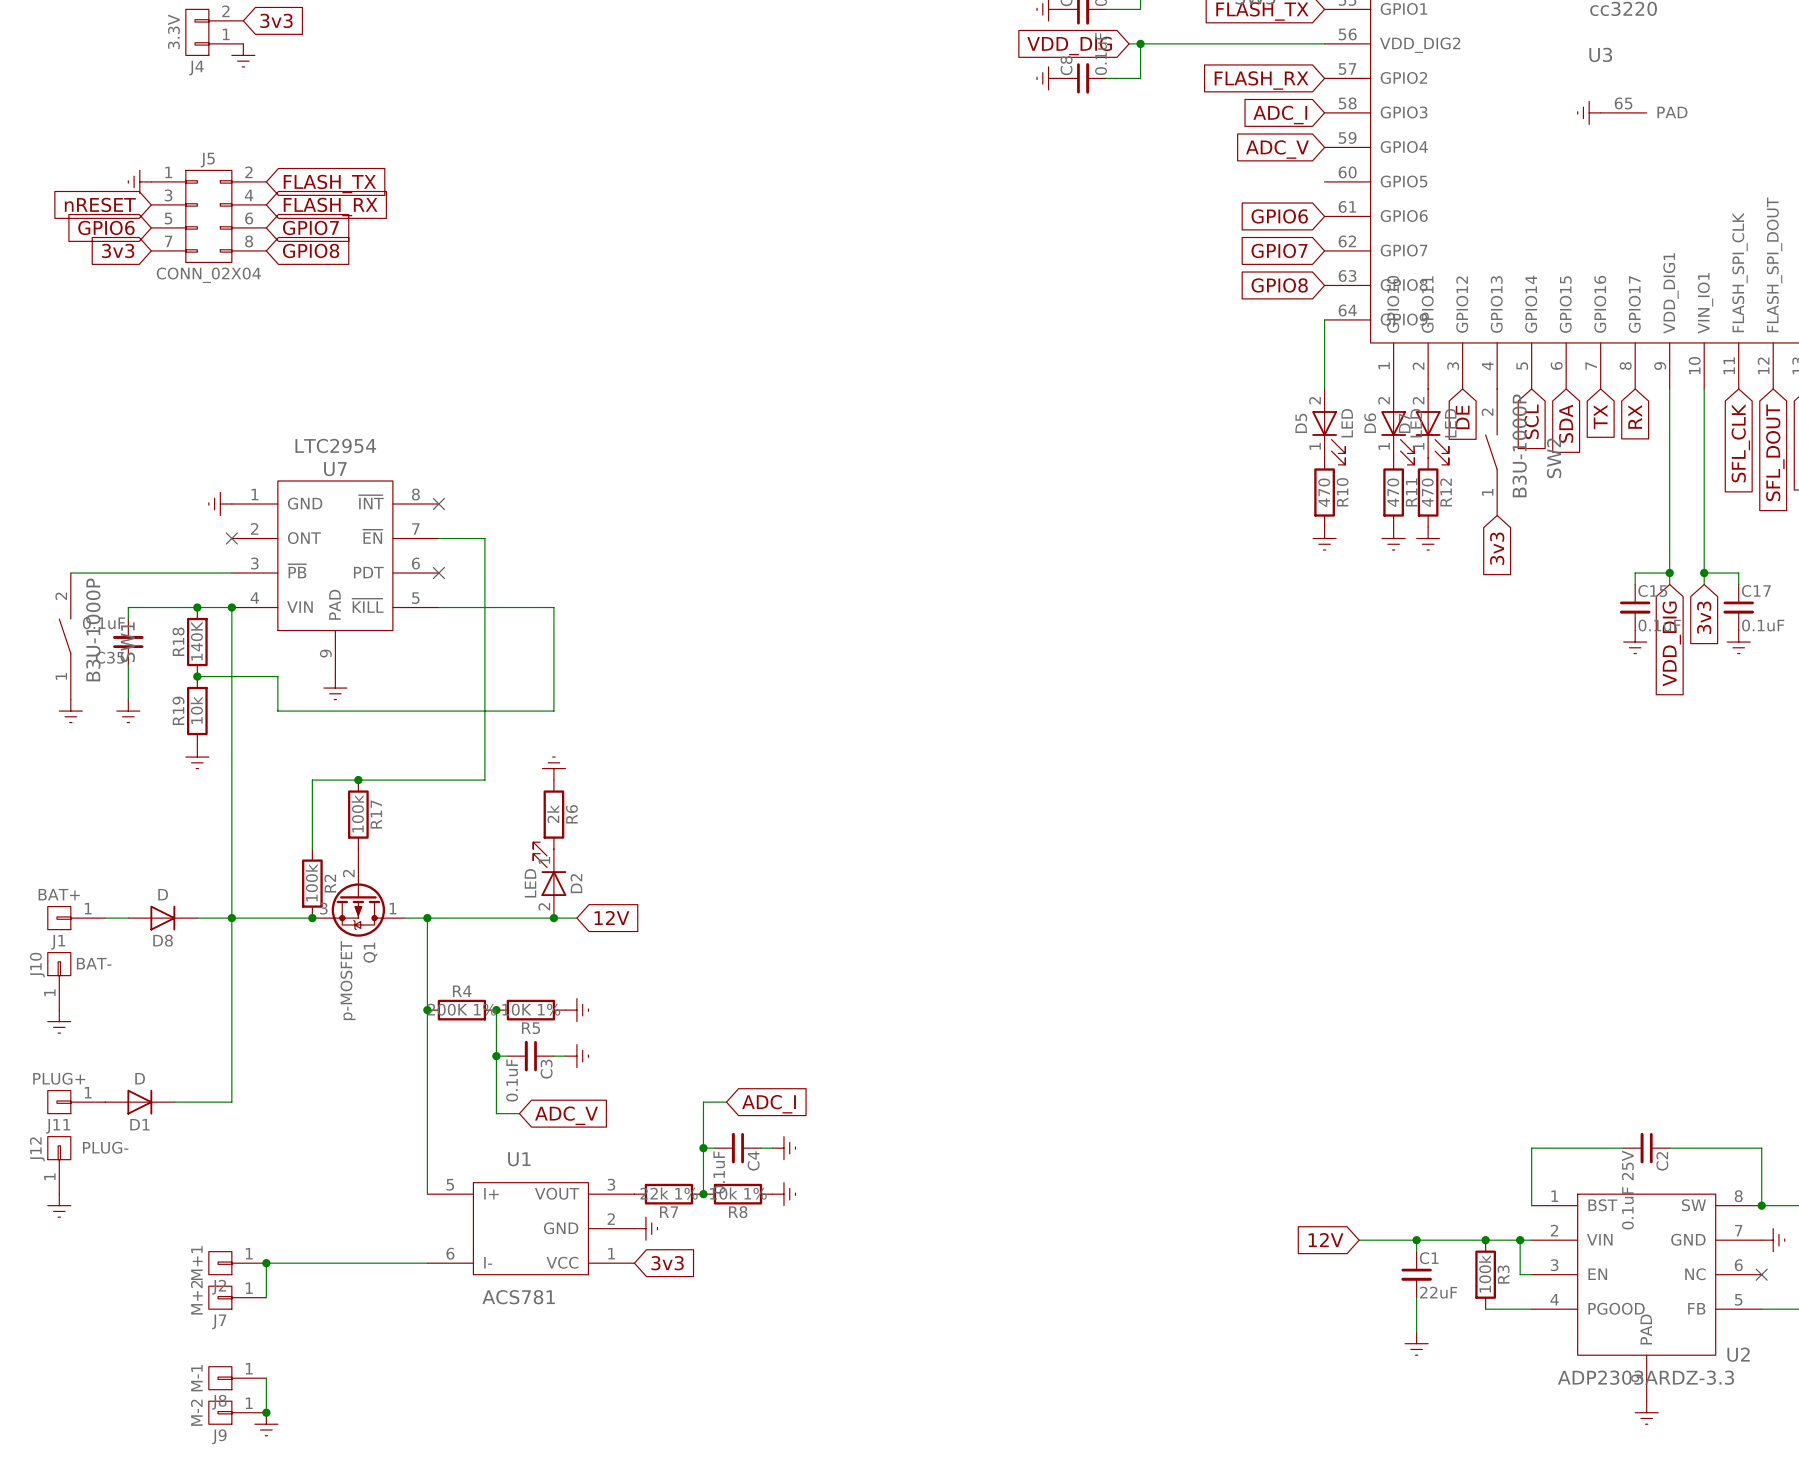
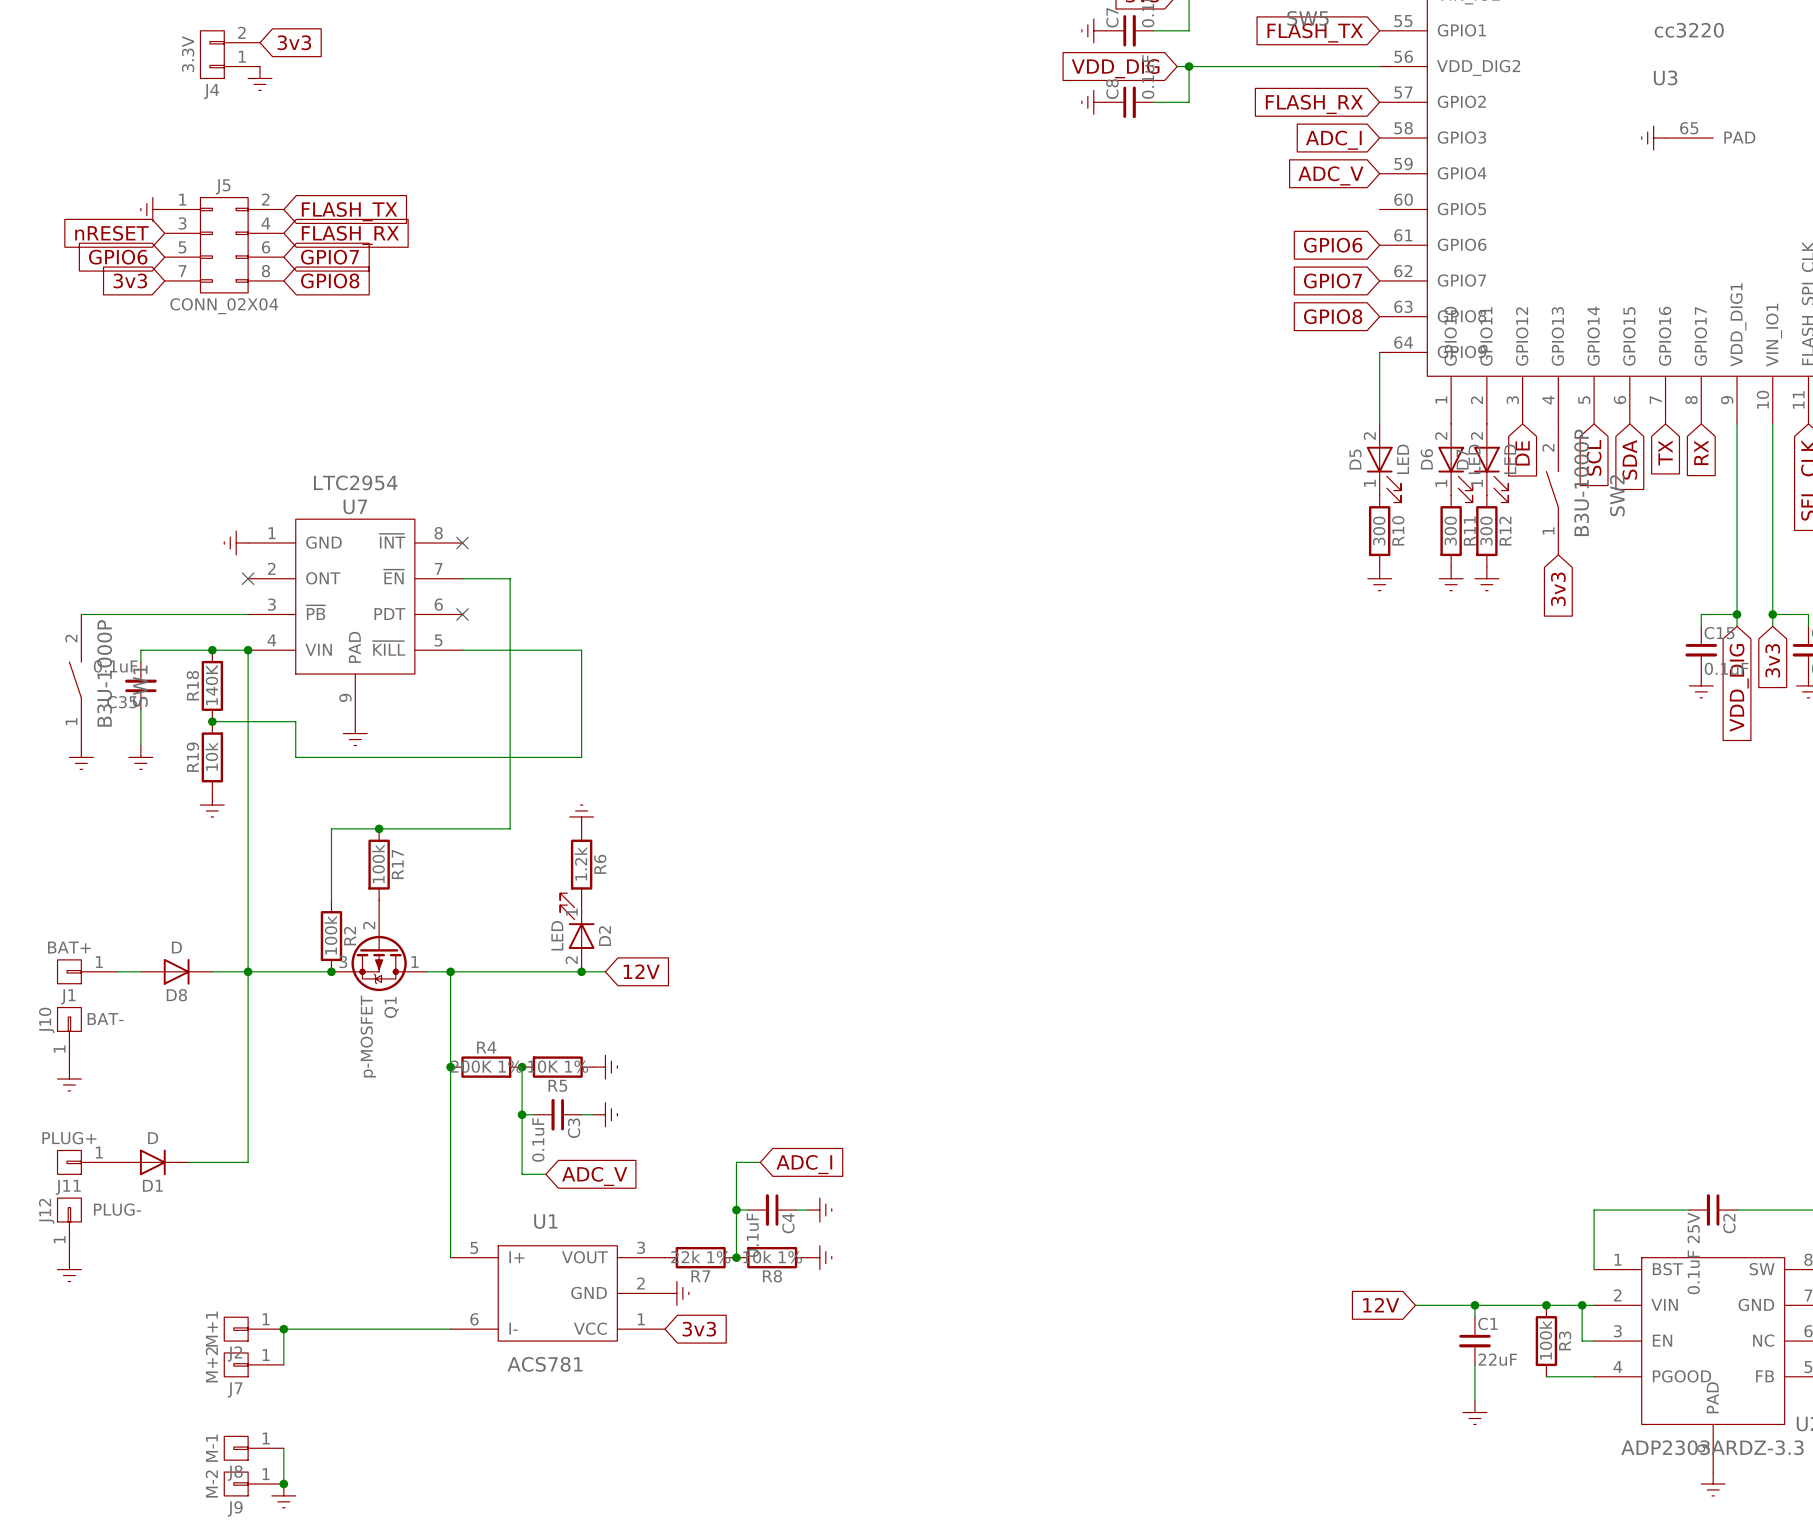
R10 value: 470 (1324, 492) -> 300 (1379, 531)
R11 value: 470 (1393, 492) -> 300 (1450, 531)
R12 value: 470 (1427, 492) -> 300 (1486, 531)
R6 value: 2k (553, 814) -> 1.2k (580, 863)

